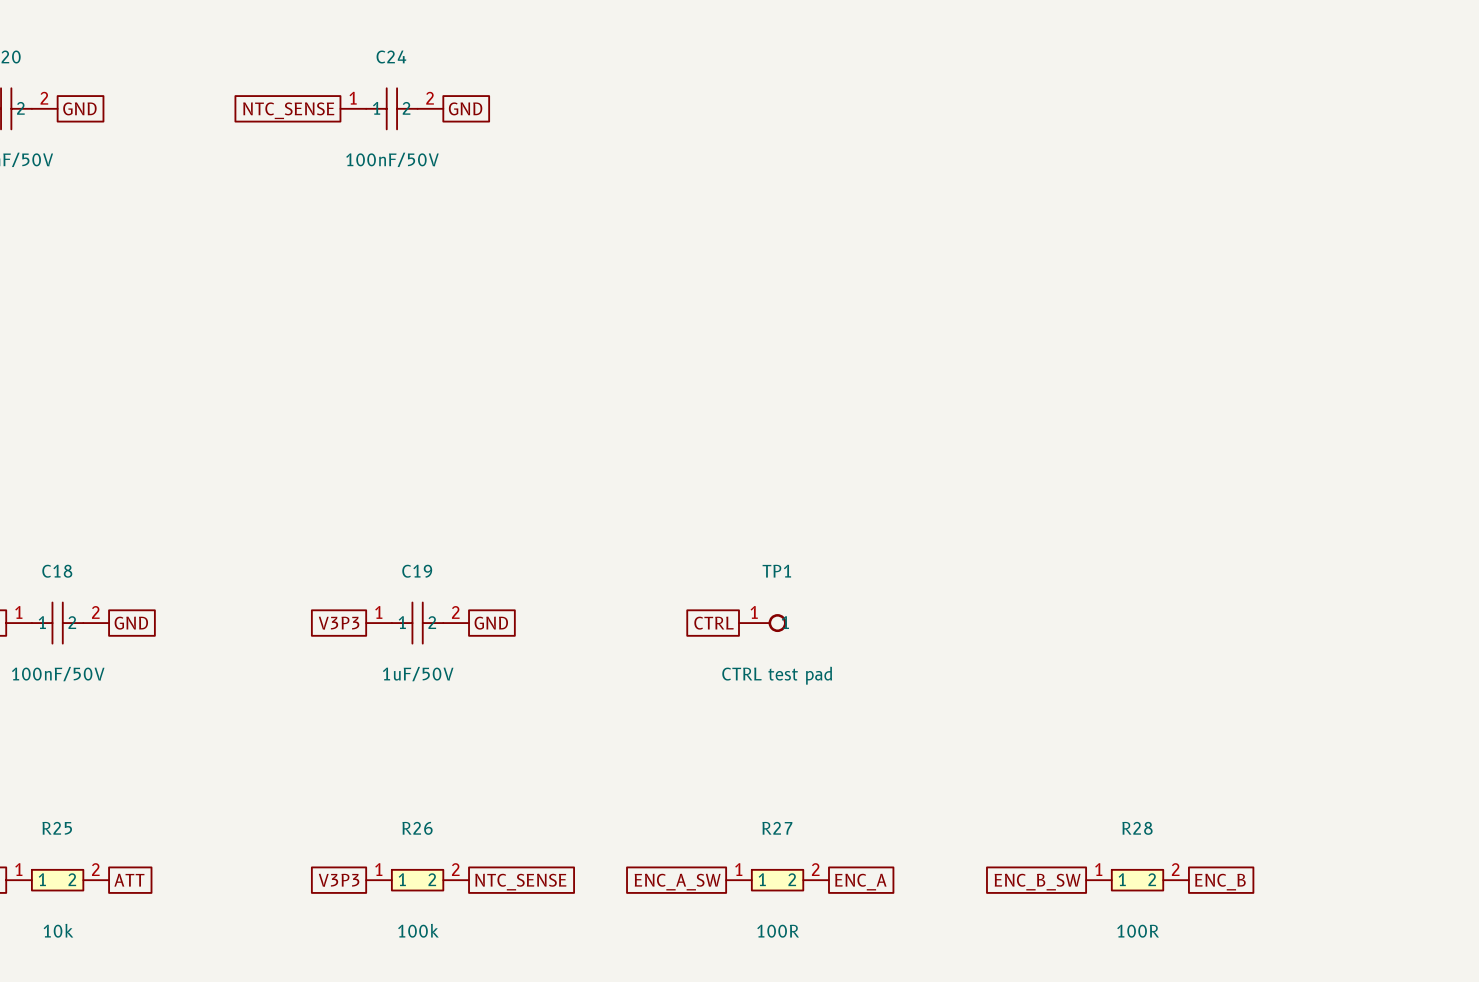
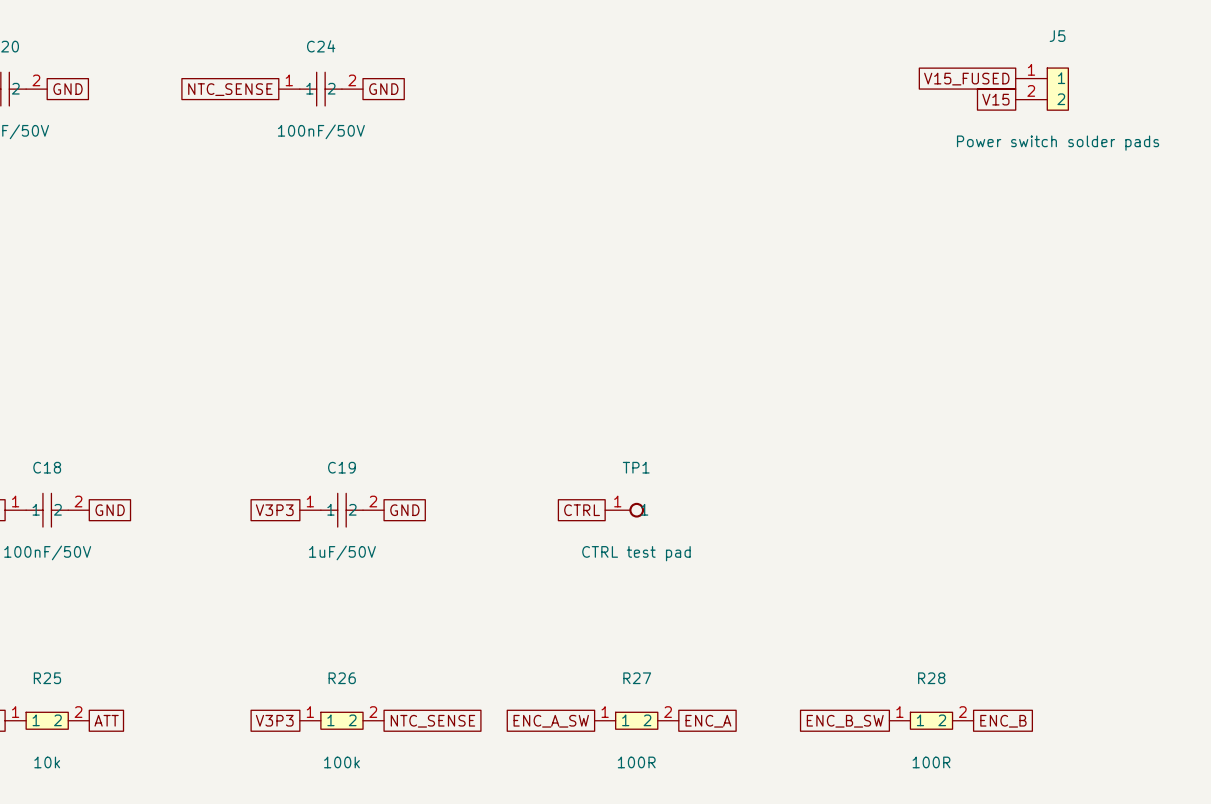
global label: none -> V15_FUSED (966, 79)
J5: none -> Power switch solder pads (1042, 89)
global label: none -> V15 (995, 99)

